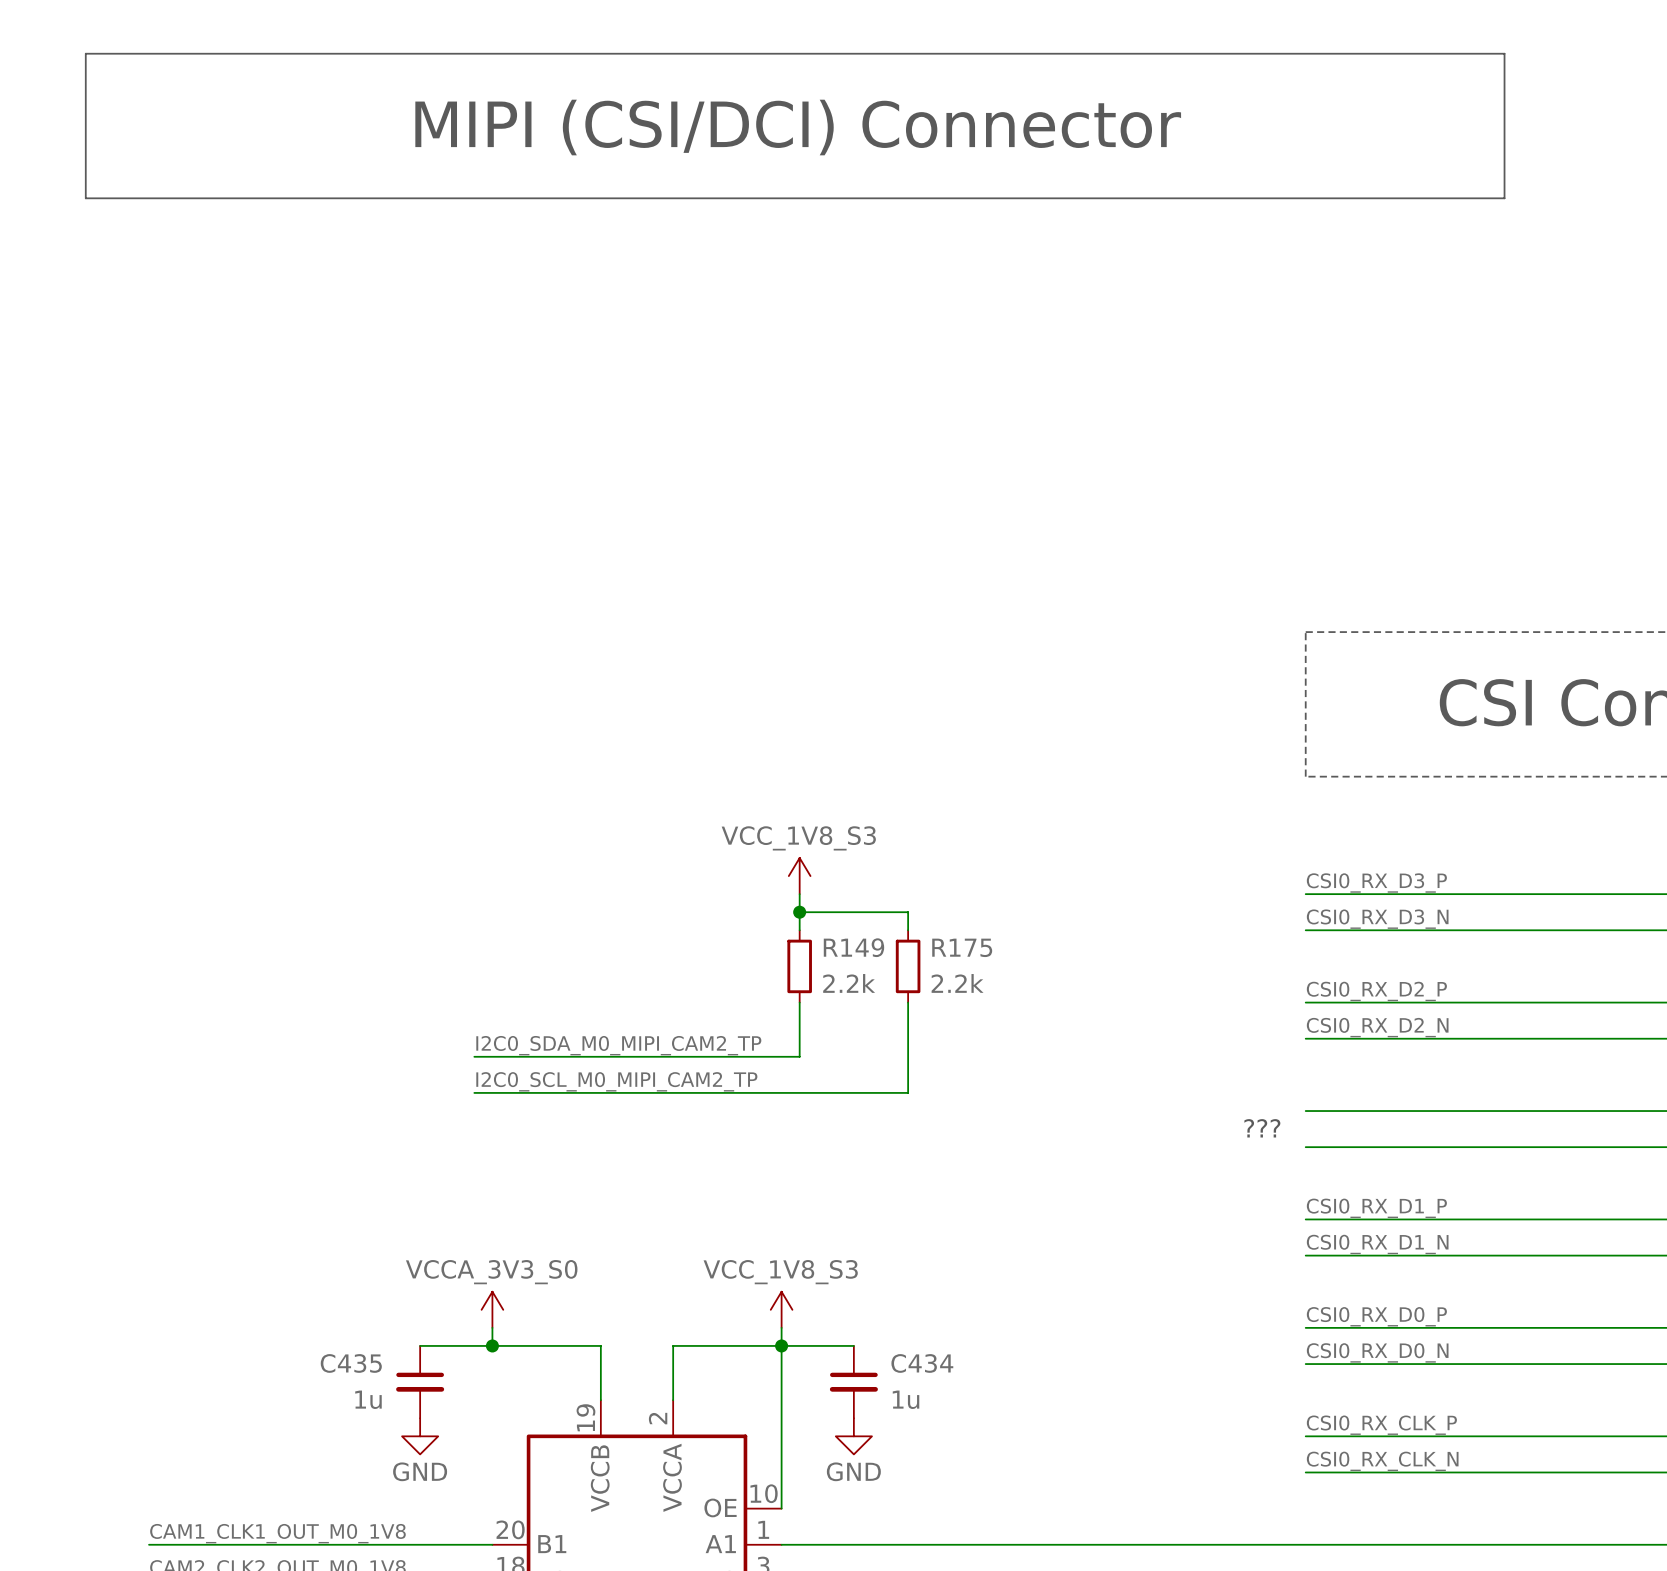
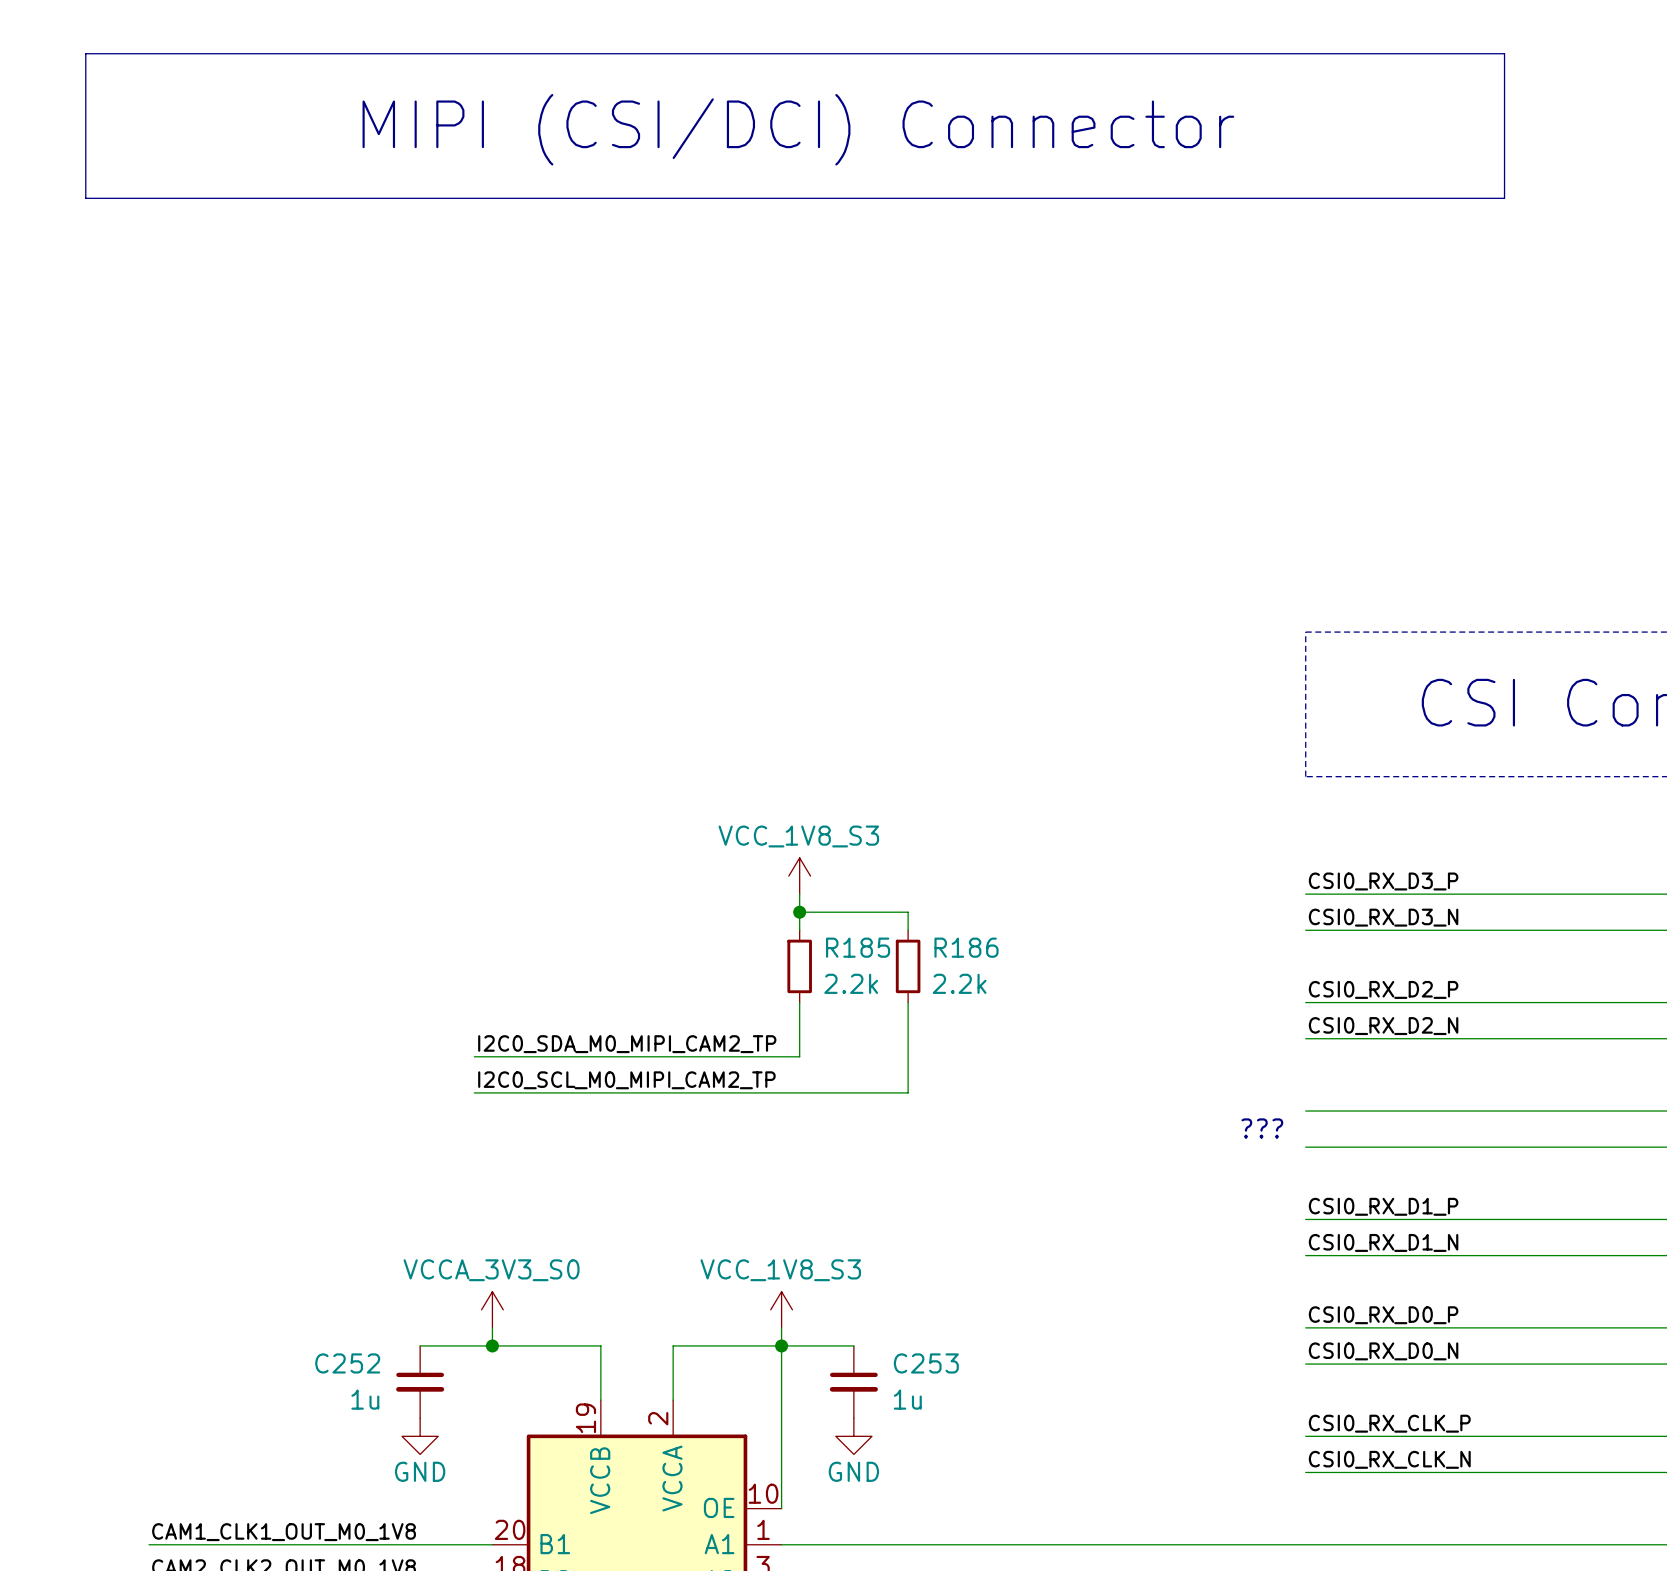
R149 name: R149 (853, 947) -> R185 (858, 947)
R175 name: R175 (962, 947) -> R186 (966, 947)
C435 name: C435 (351, 1363) -> C252 (347, 1363)
C434 name: C434 (922, 1363) -> C253 (926, 1363)

